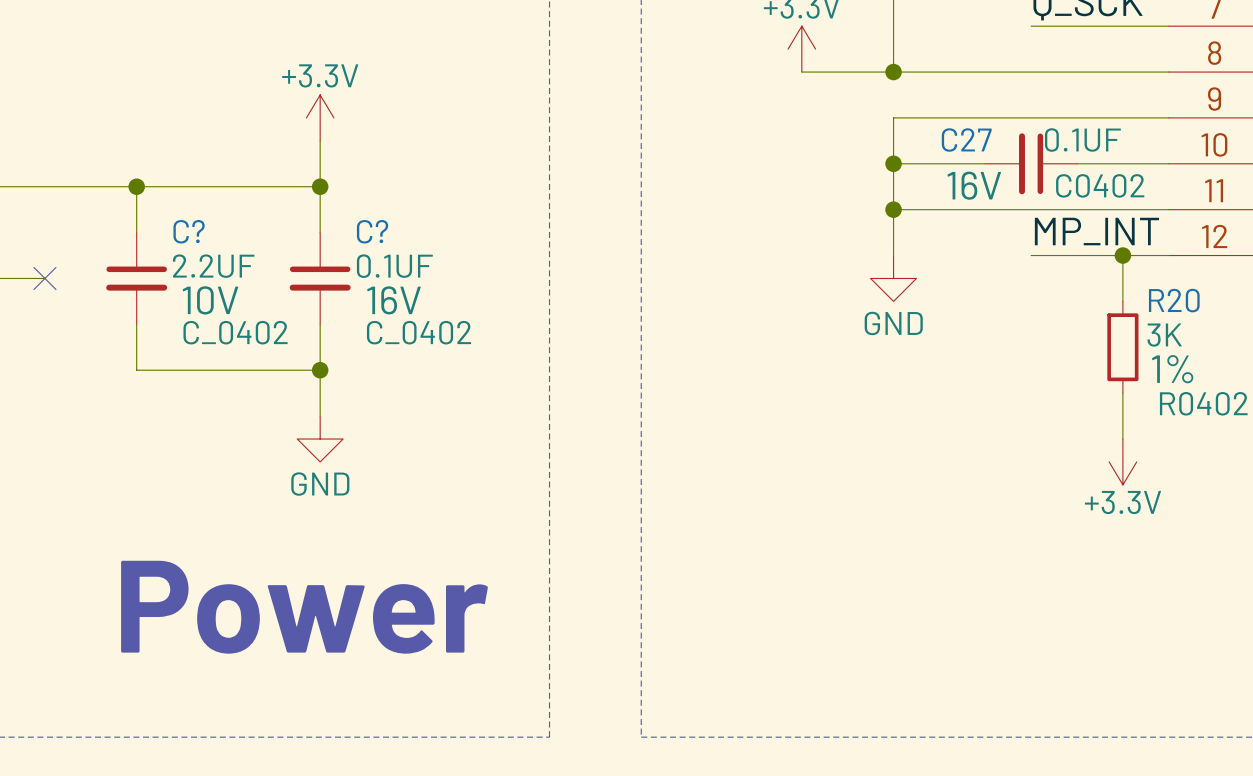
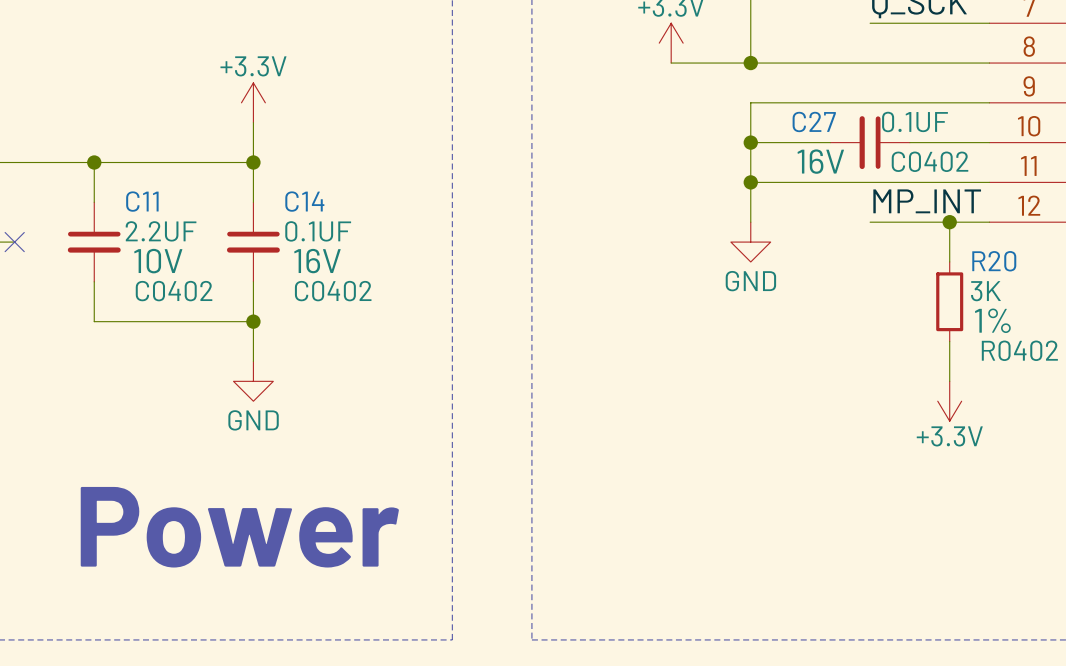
C? name: C? (189, 231) -> C11 (142, 201)
C? name: C? (372, 231) -> C14 (304, 201)
C? text: C_0402 (235, 332) -> C0402 (174, 291)
C? text: C_0402 (419, 332) -> C0402 (333, 291)

